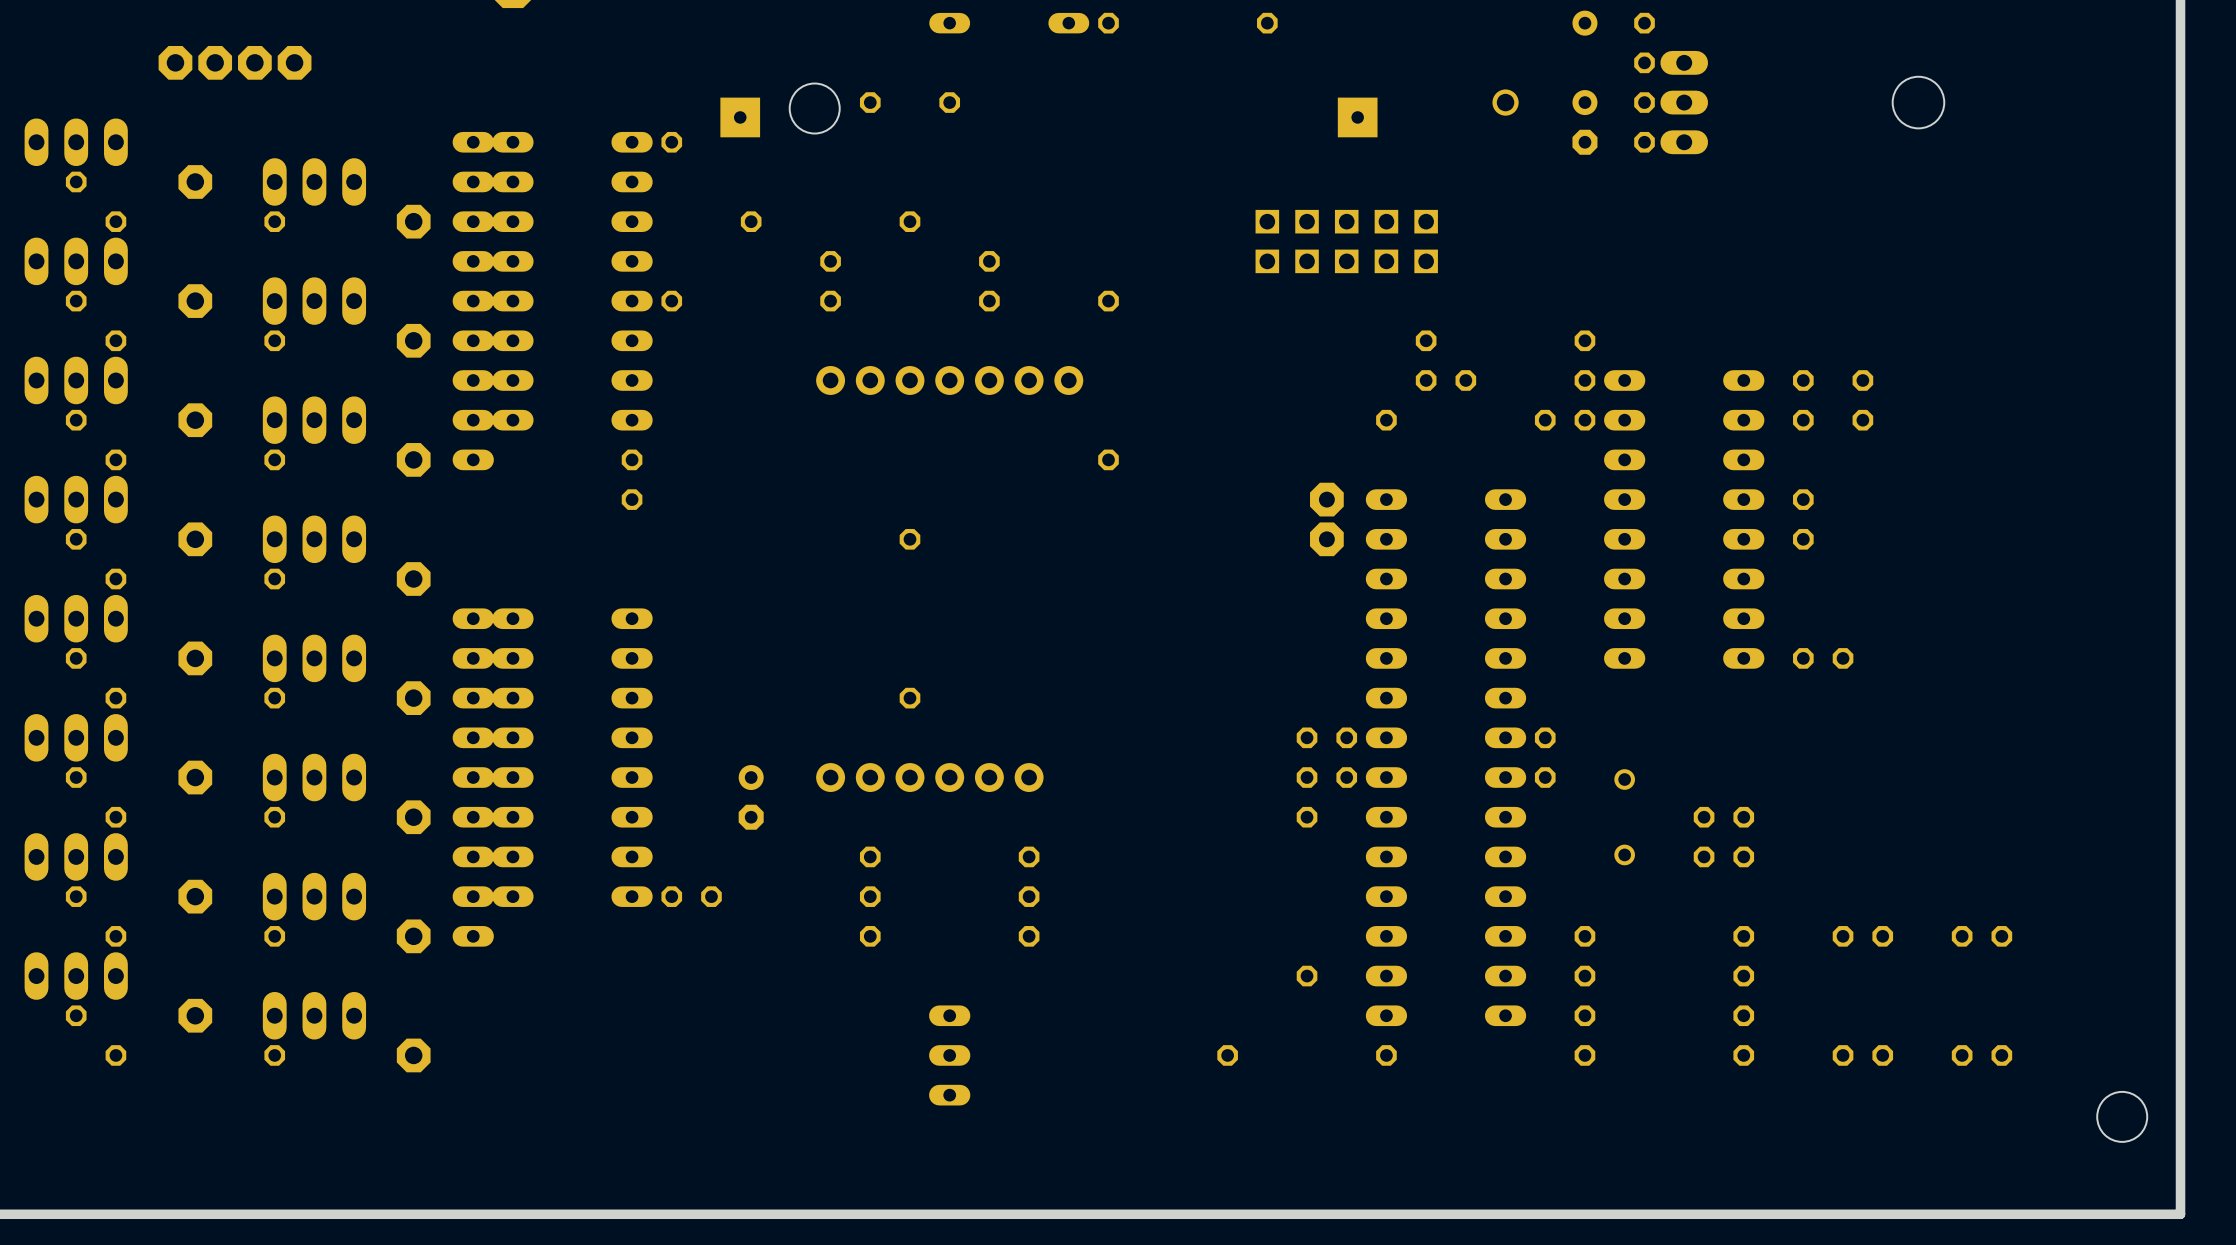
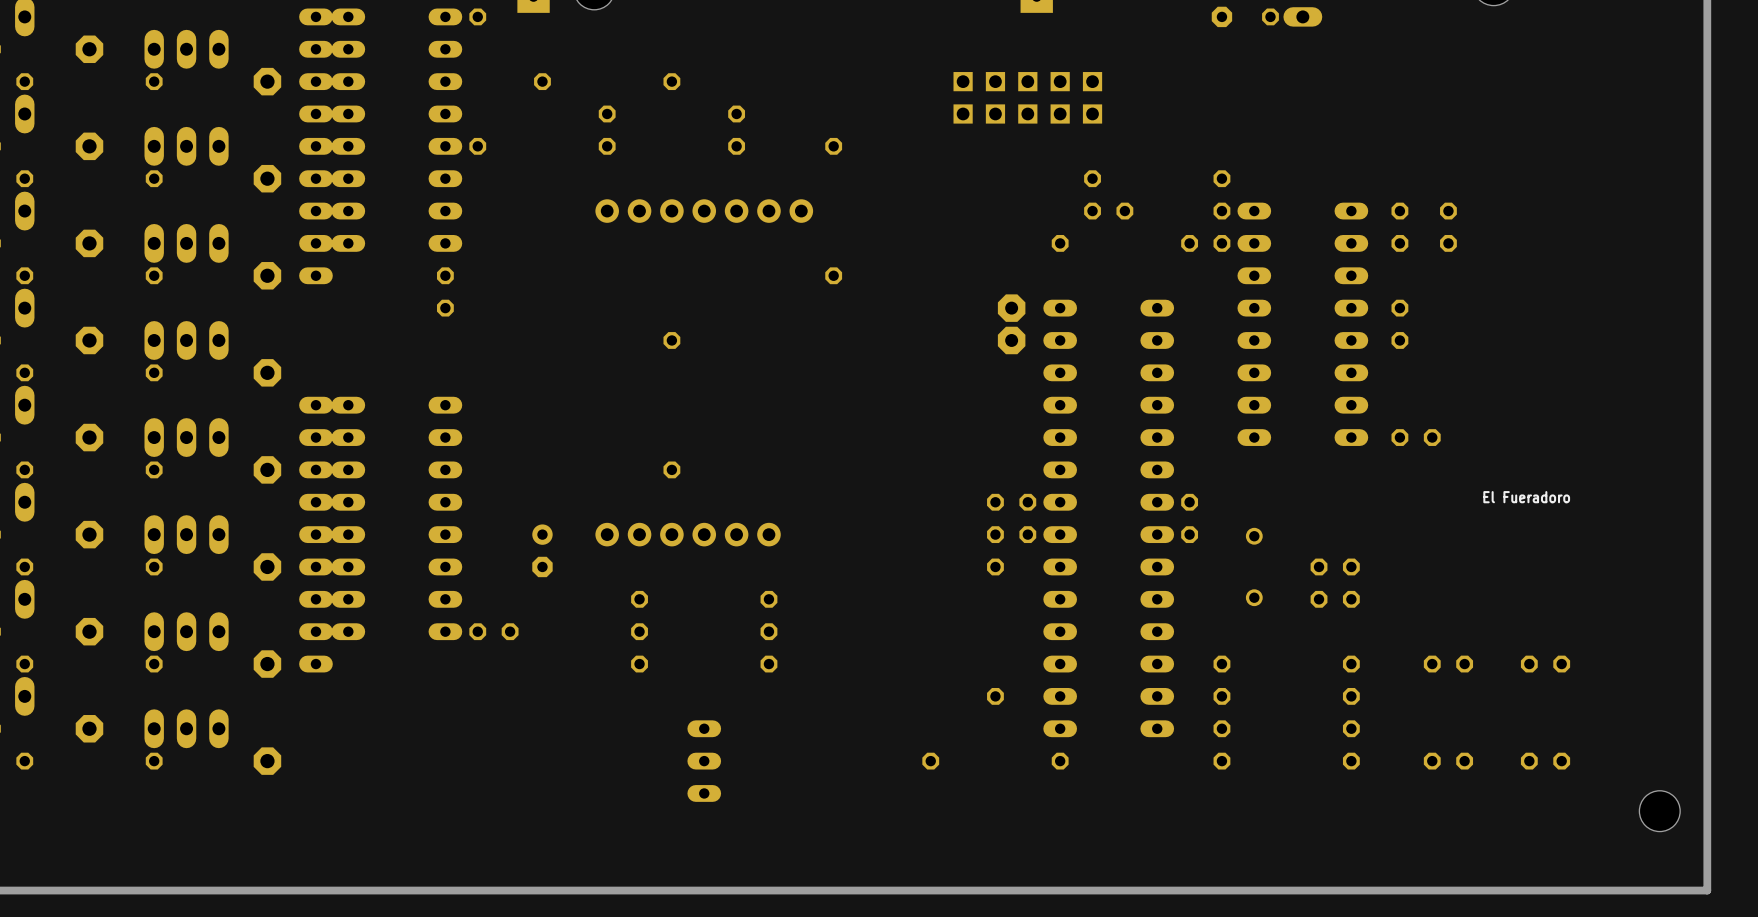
text: none -> El Fueradoro (1526, 497)

